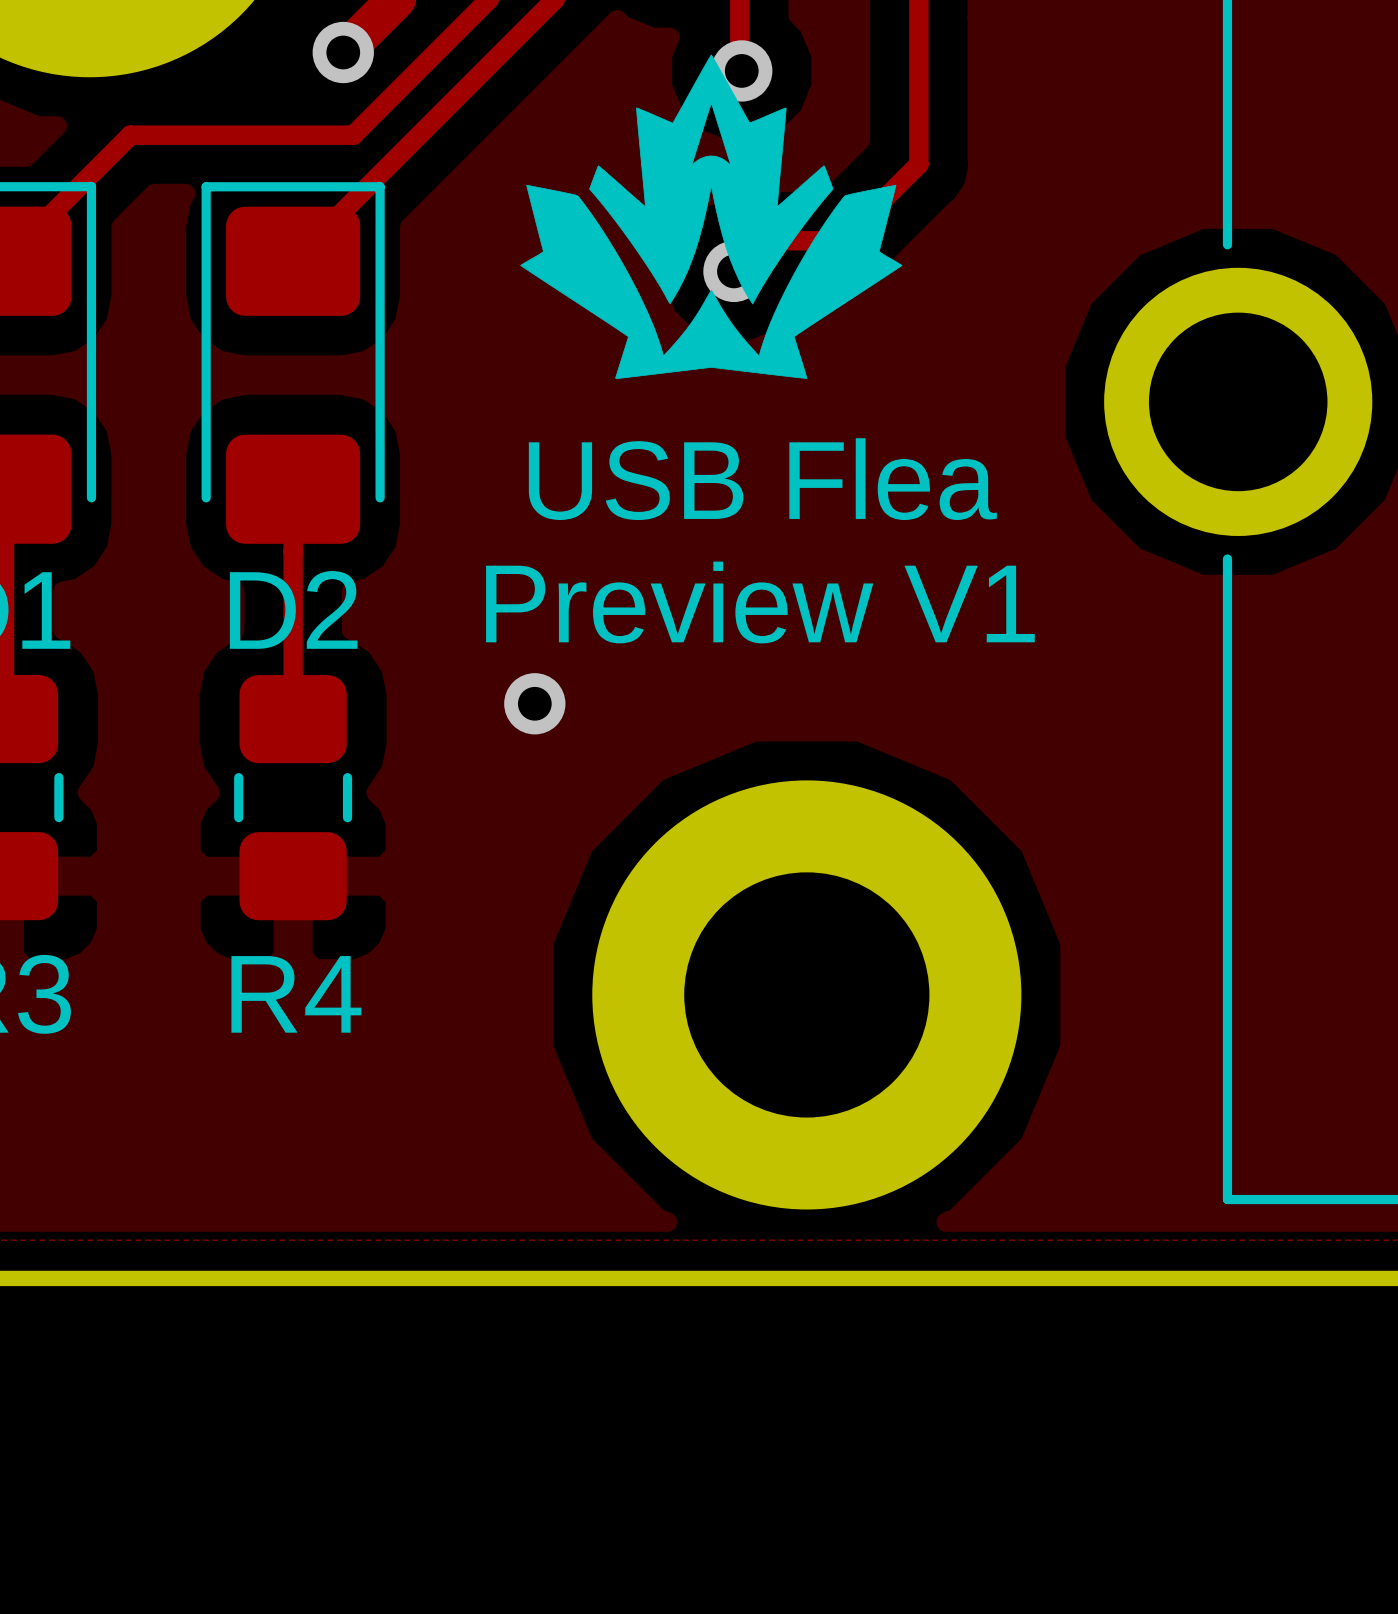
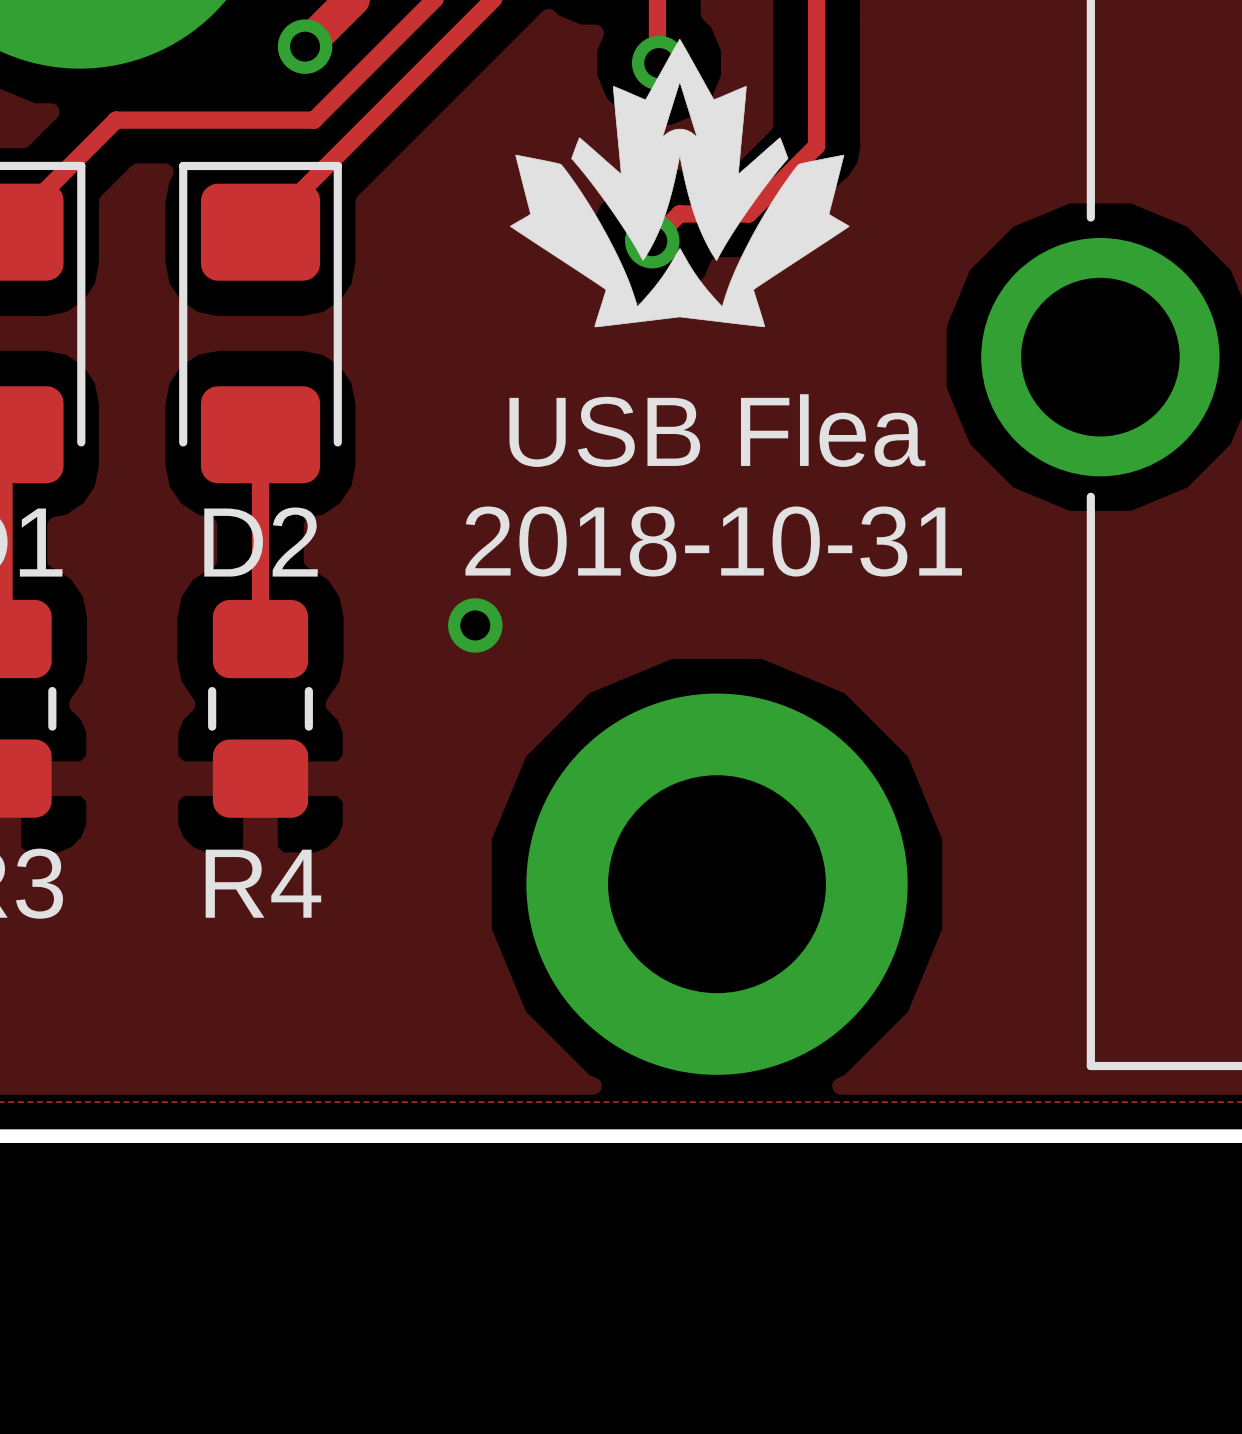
drawing position: (711, 216) -> (679, 183)
text position: USB Flea (762, 479) -> USB Flea (717, 430)
text: Preview V1 (760, 602) -> 2018-10-31 (713, 541)

